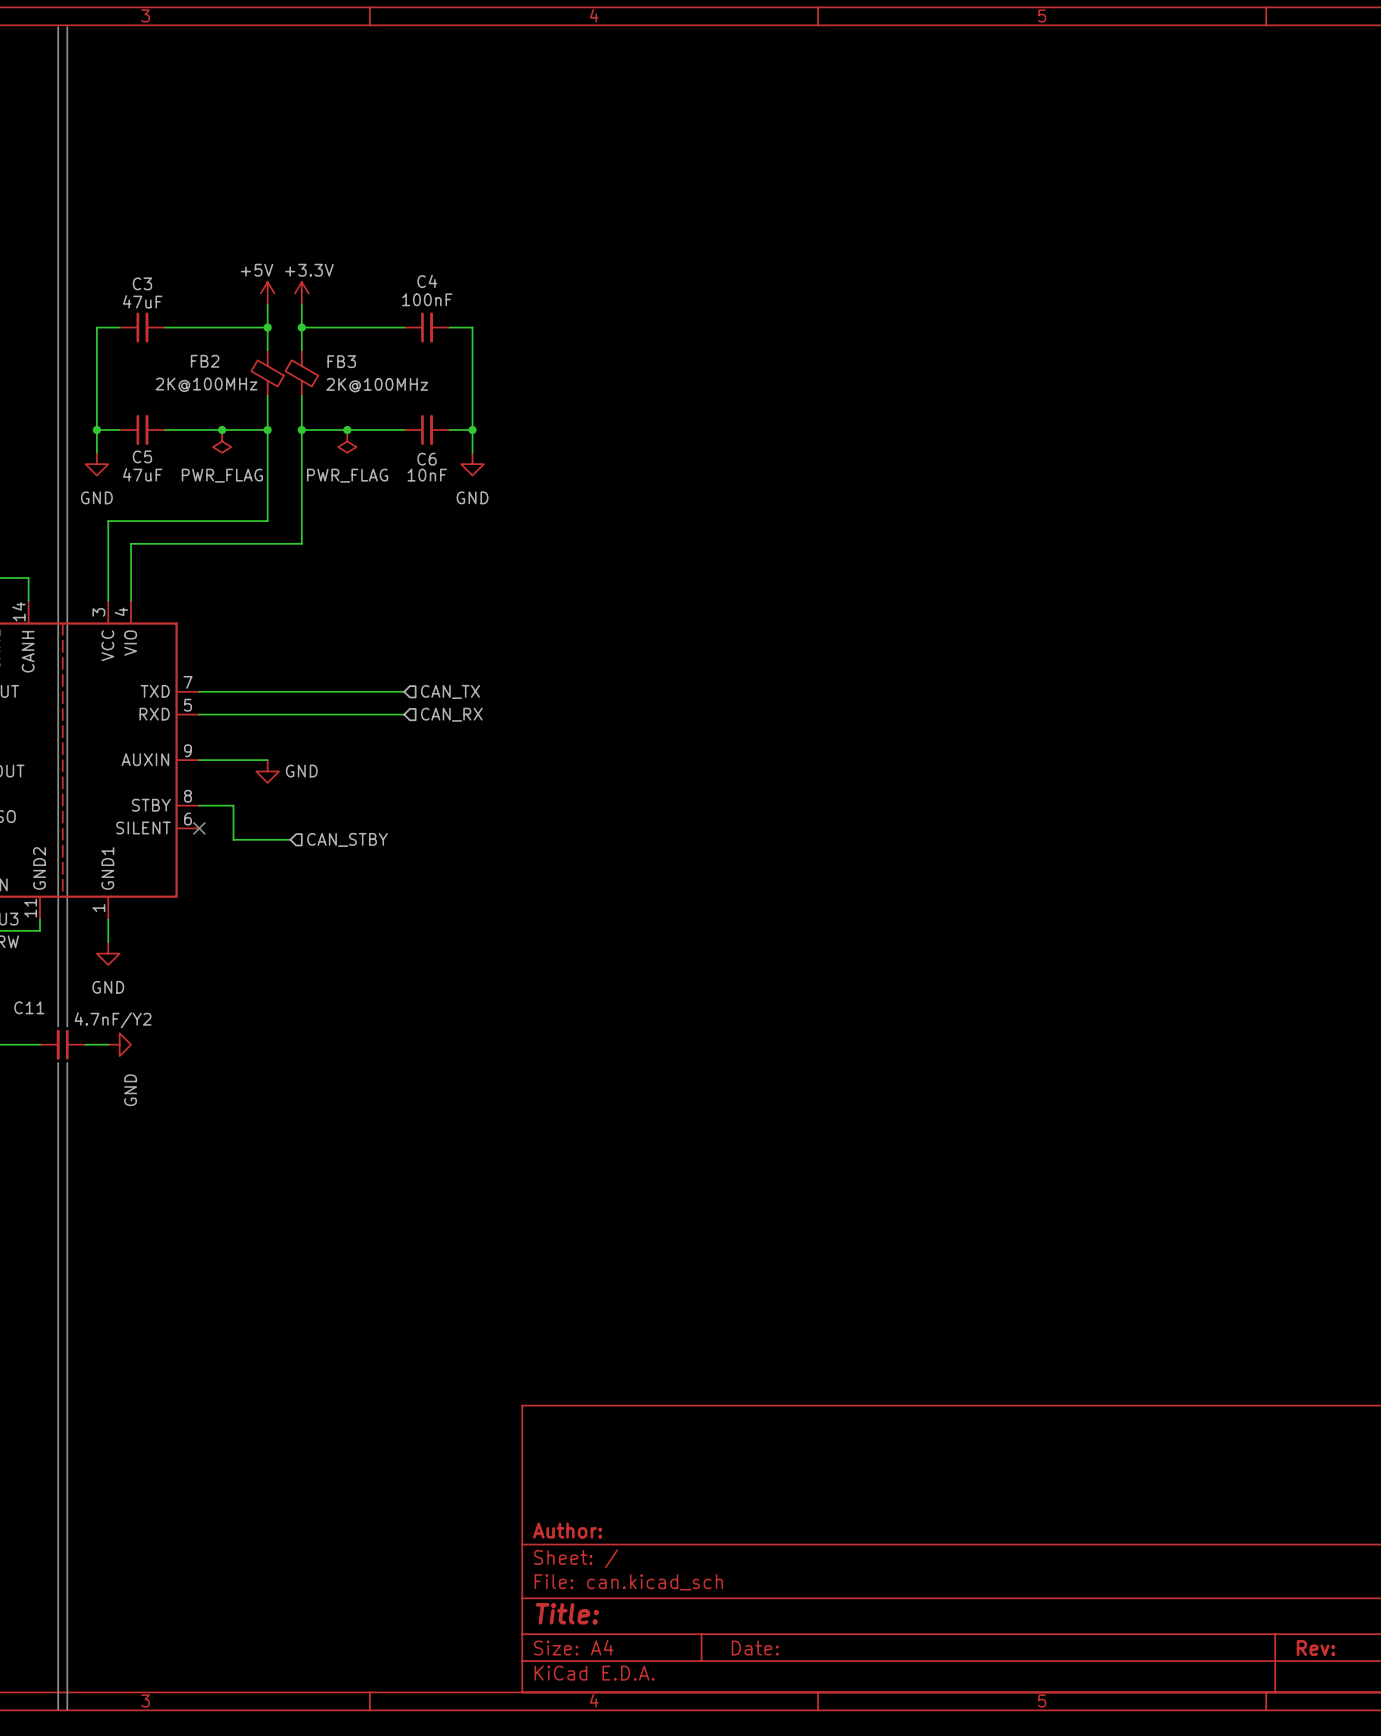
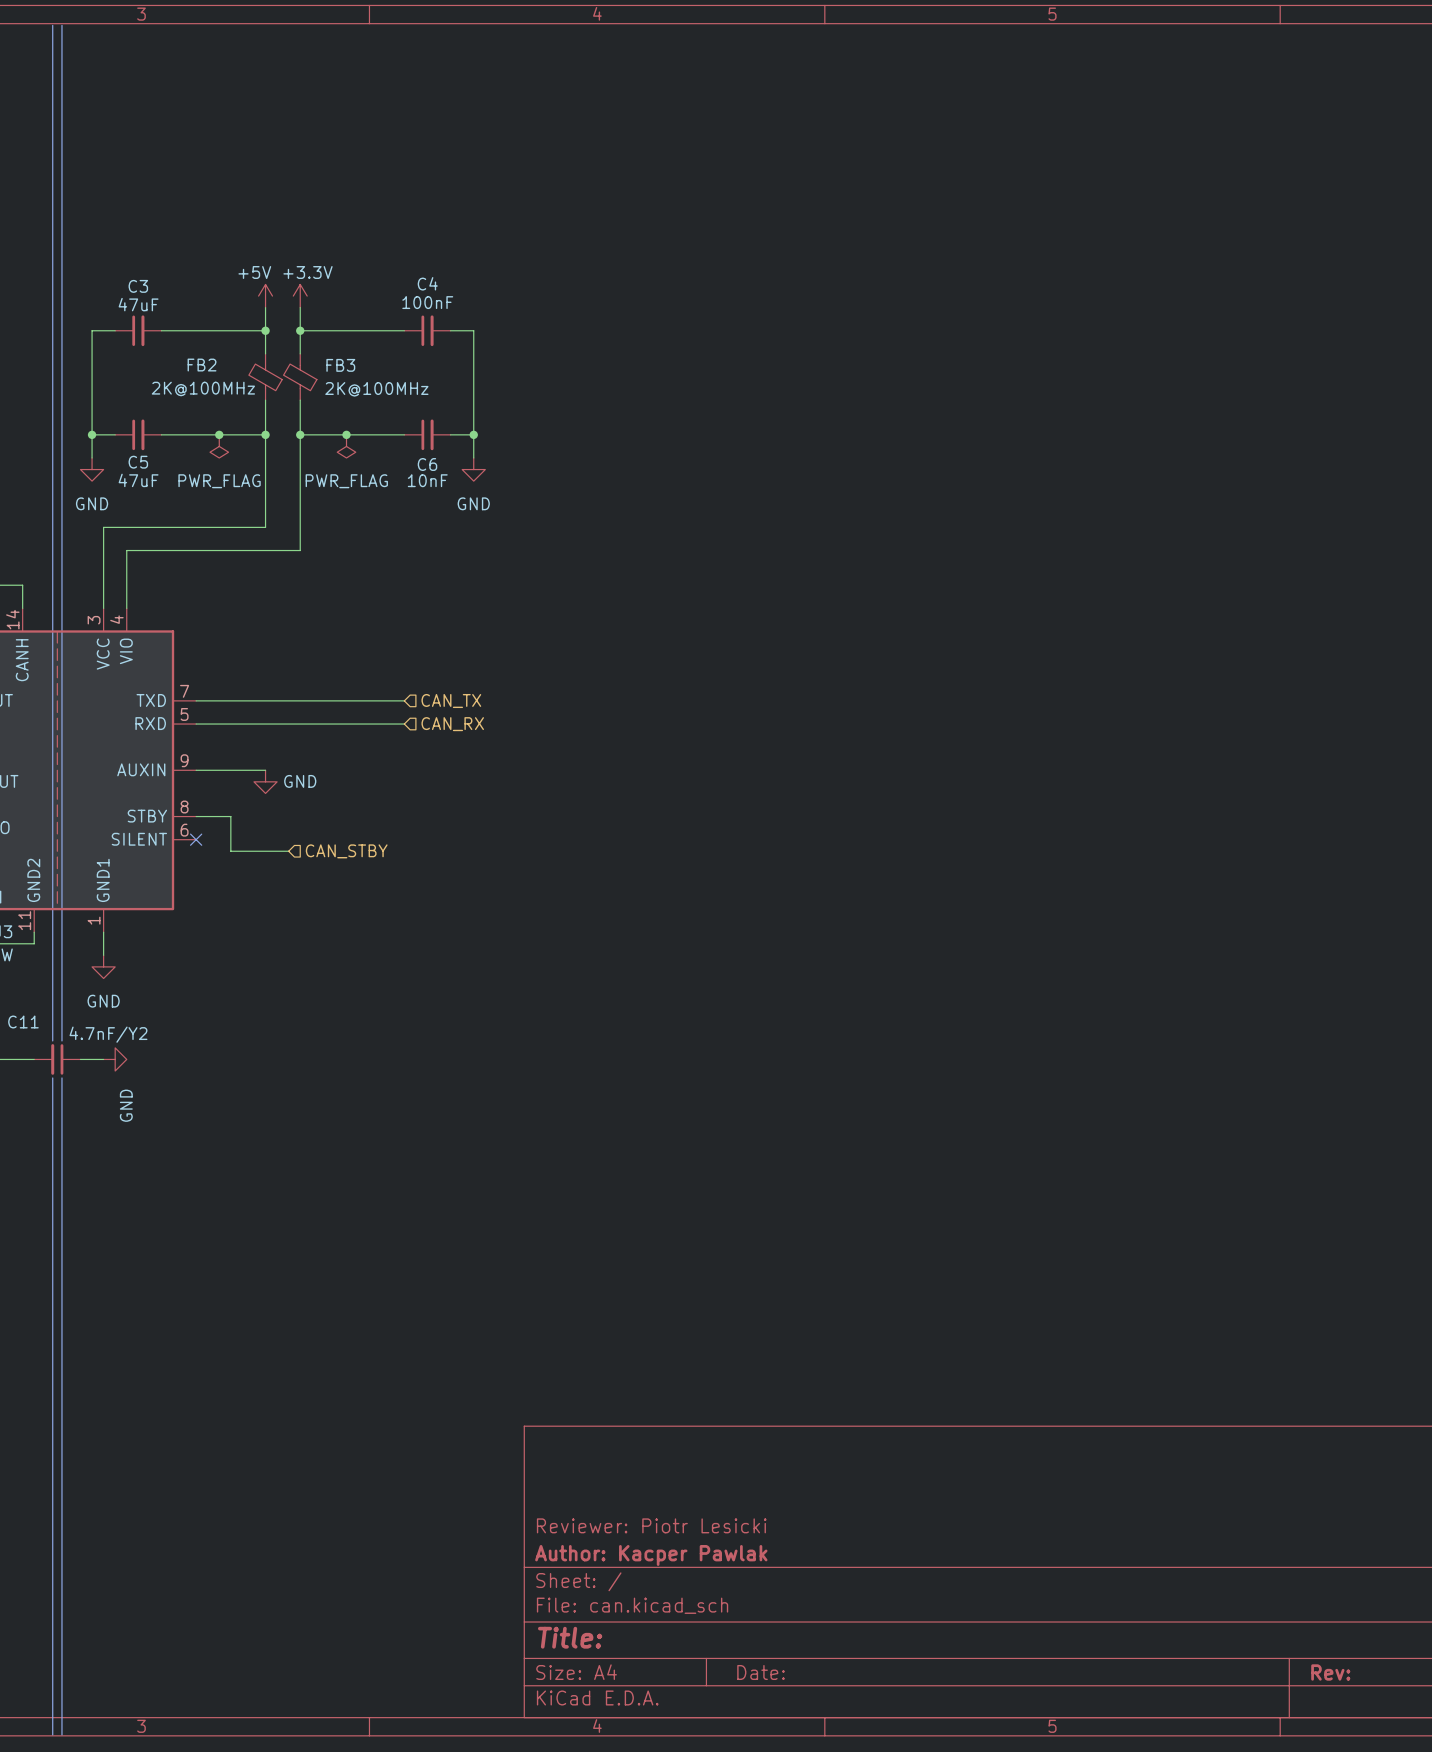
title block: none -> Reviewer: Piotr Lesicki (651, 1525)
title block: Author: (567, 1530) -> Author: Kacper Pawlak (651, 1555)

